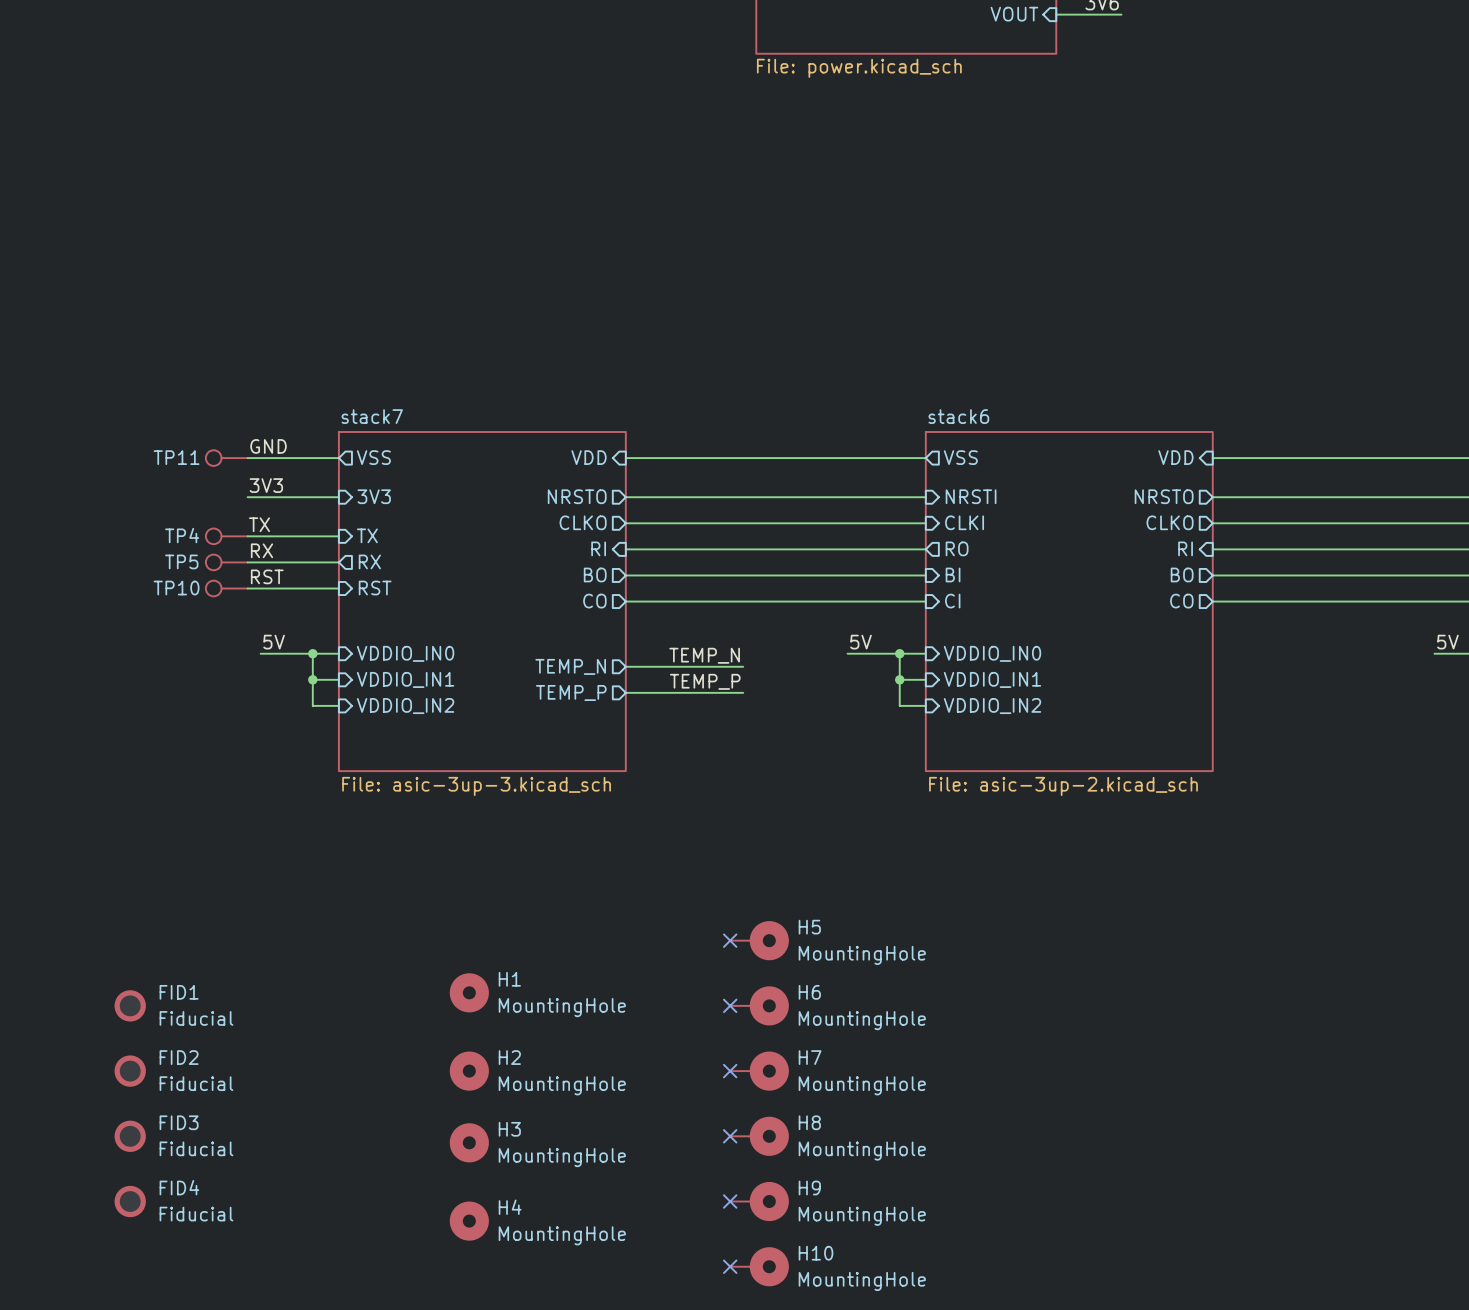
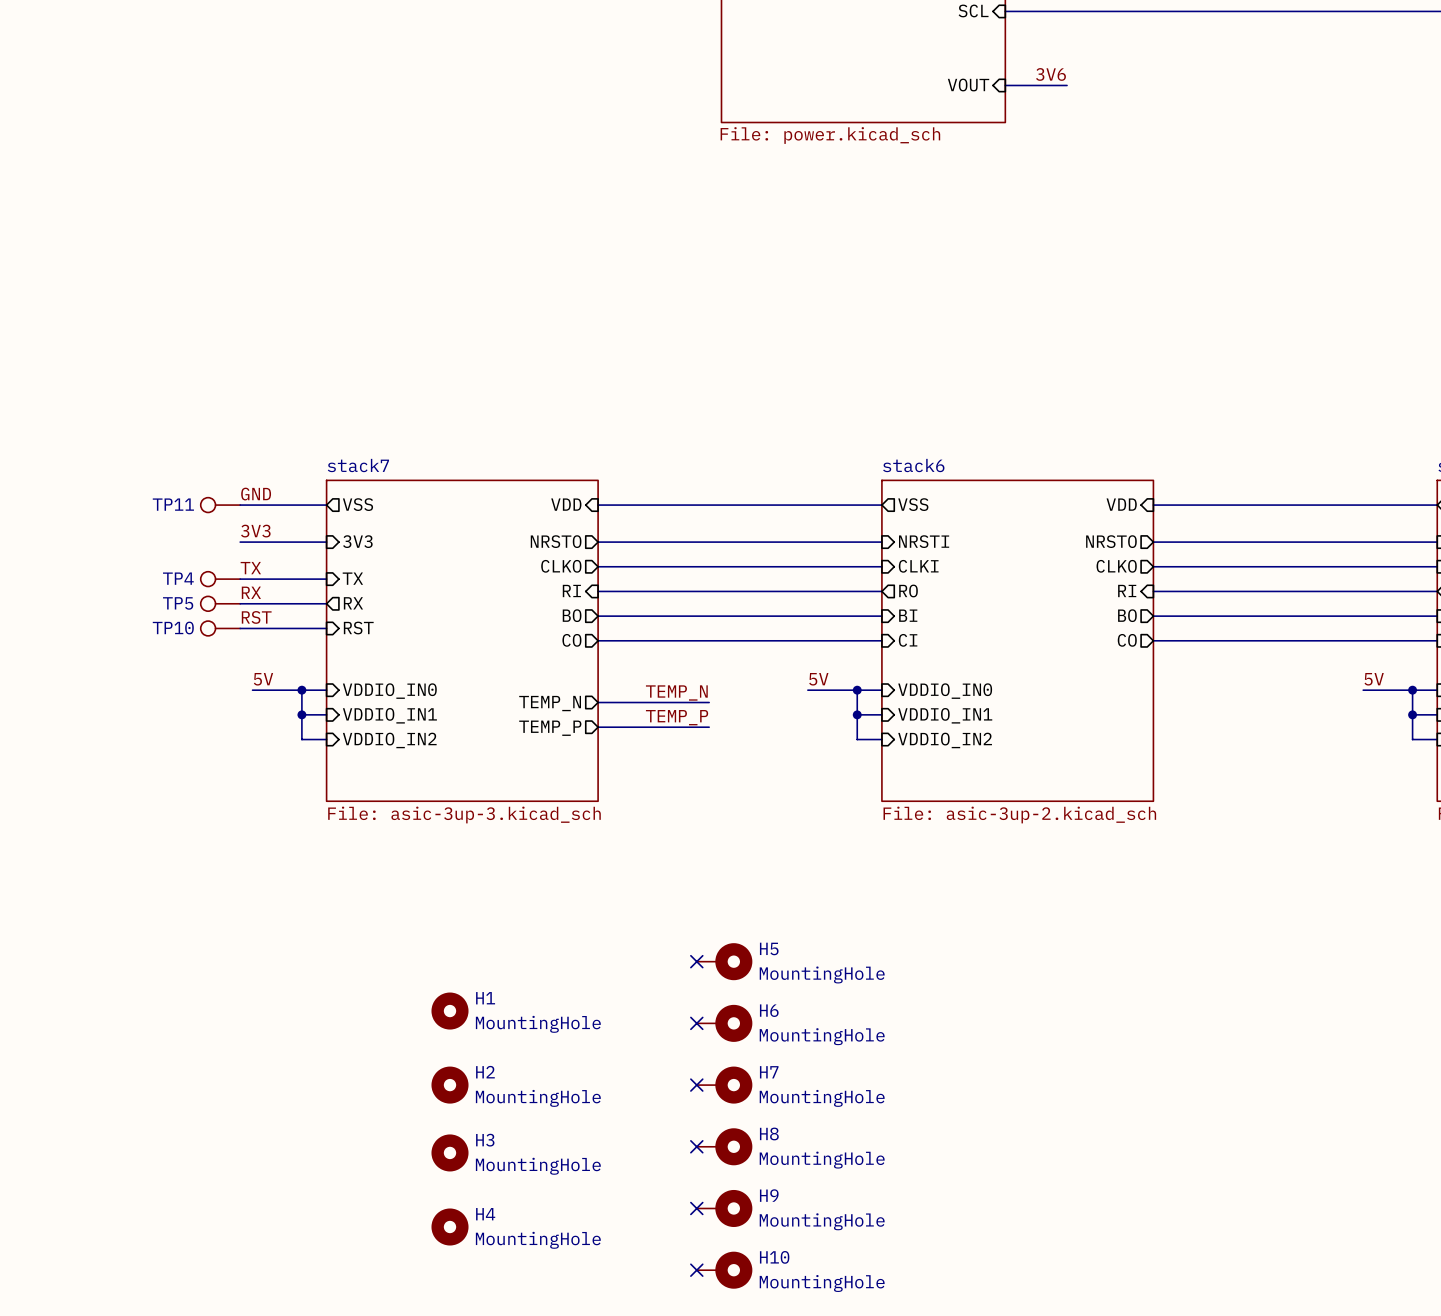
FID1: Fiducial (130, 1005) -> none
FID2: Fiducial (130, 1071) -> none
FID3: Fiducial (130, 1136) -> none
FID4: Fiducial (130, 1201) -> none

